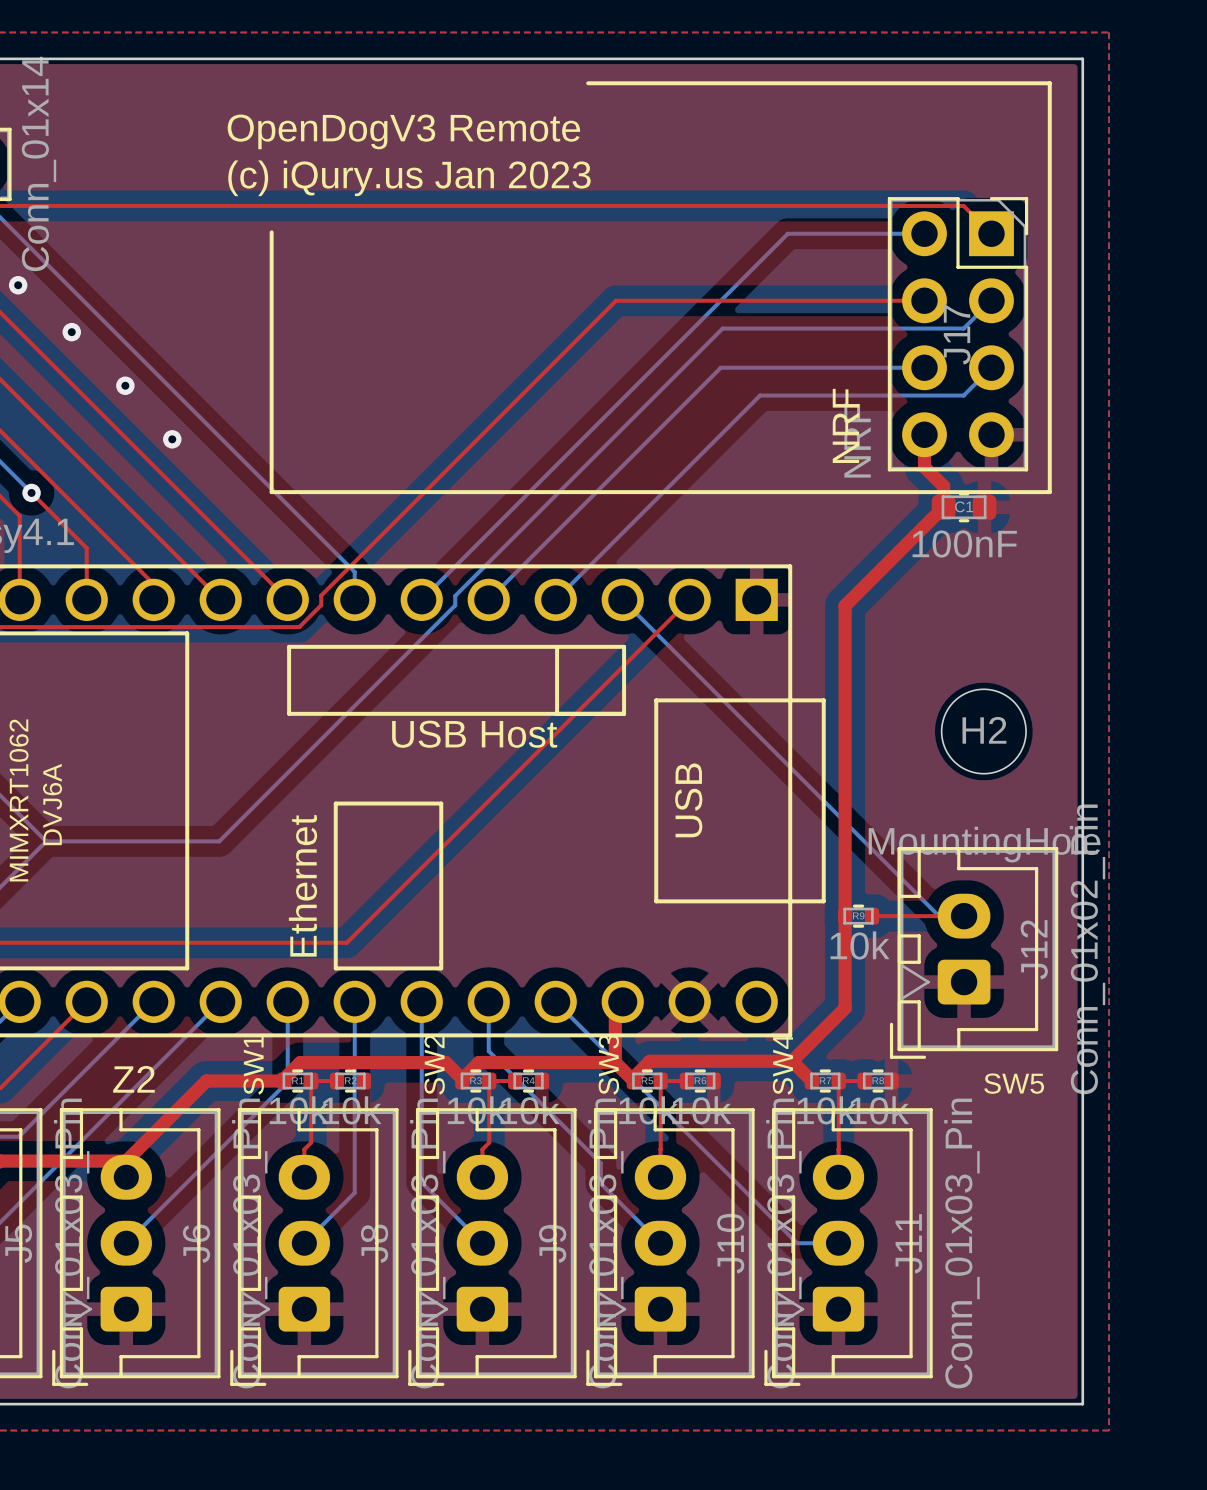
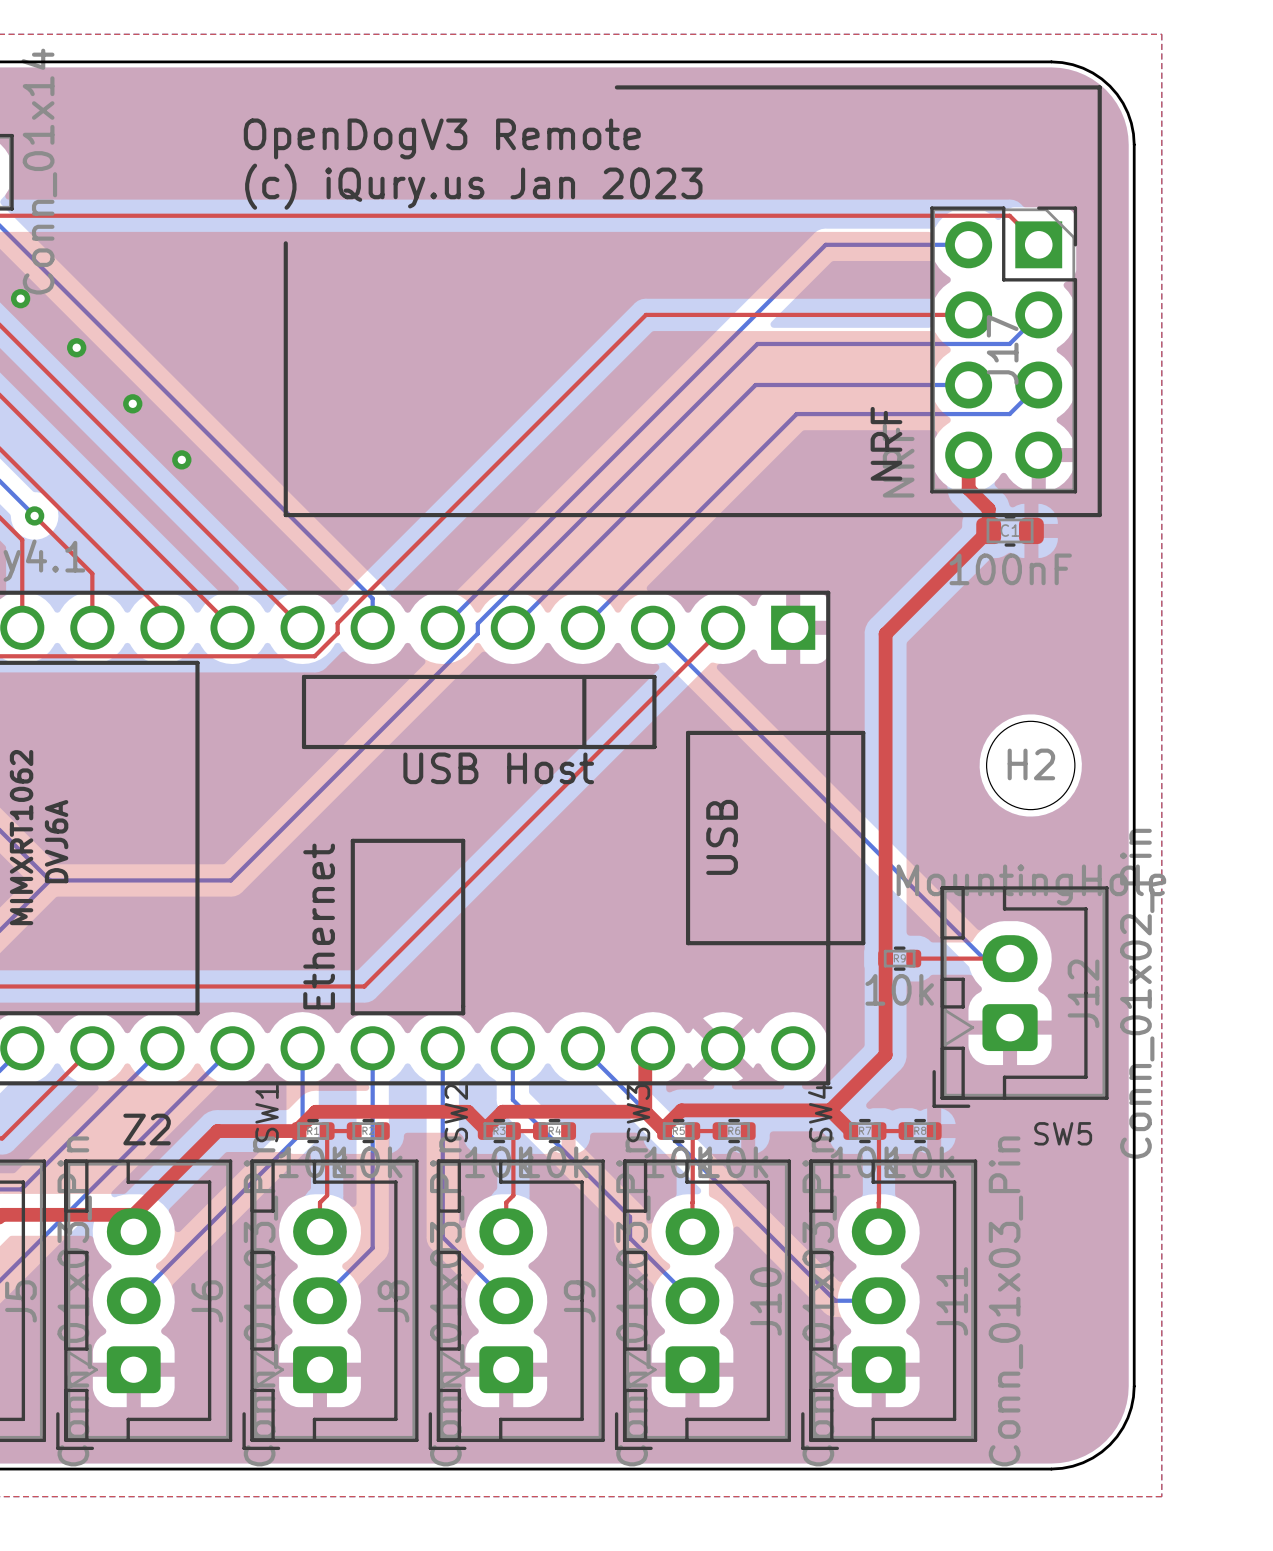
board edge: (1003, 58) (1082, 58) (1082, 138) -> (1051, 61) (1083, 68) (1109, 86) (1127, 112) (1134, 144)
board edge: (1082, 1324) (1082, 1404) (1003, 1404) -> (1134, 1386) (1127, 1417) (1109, 1444) (1083, 1462) (1051, 1469)

